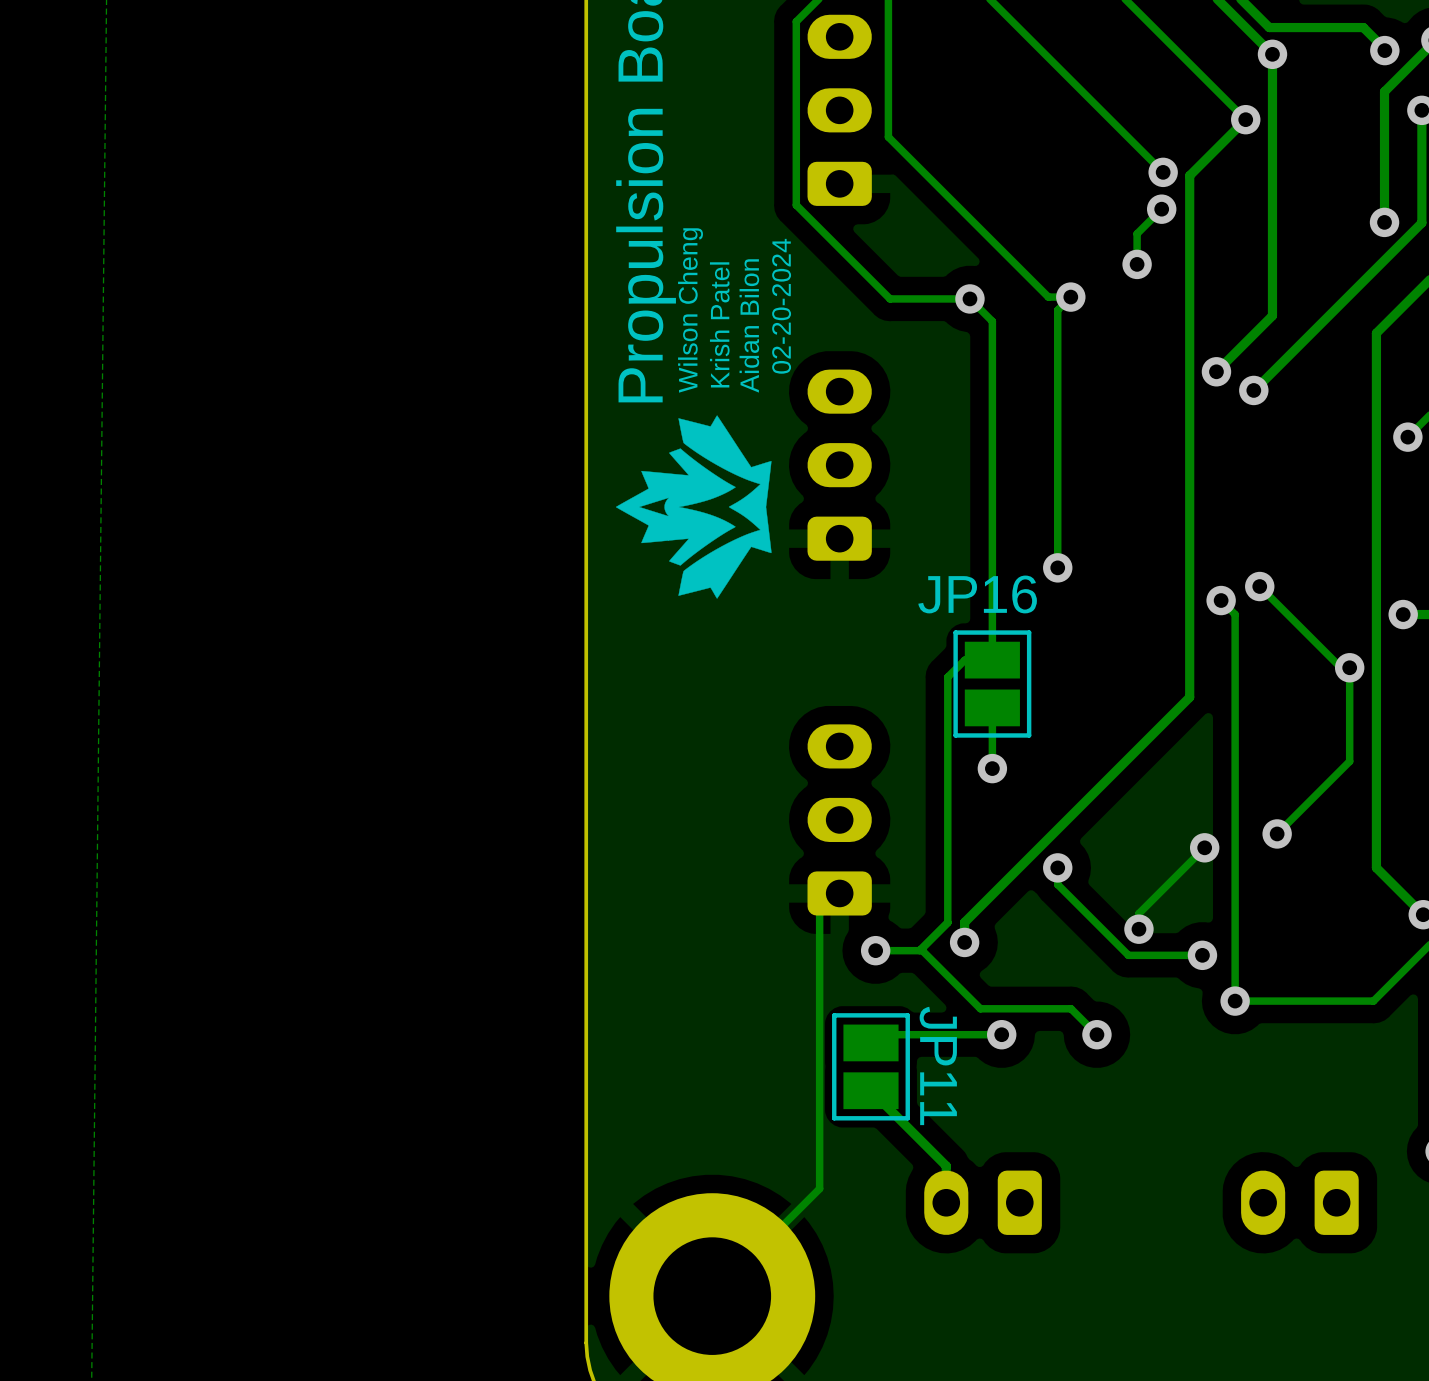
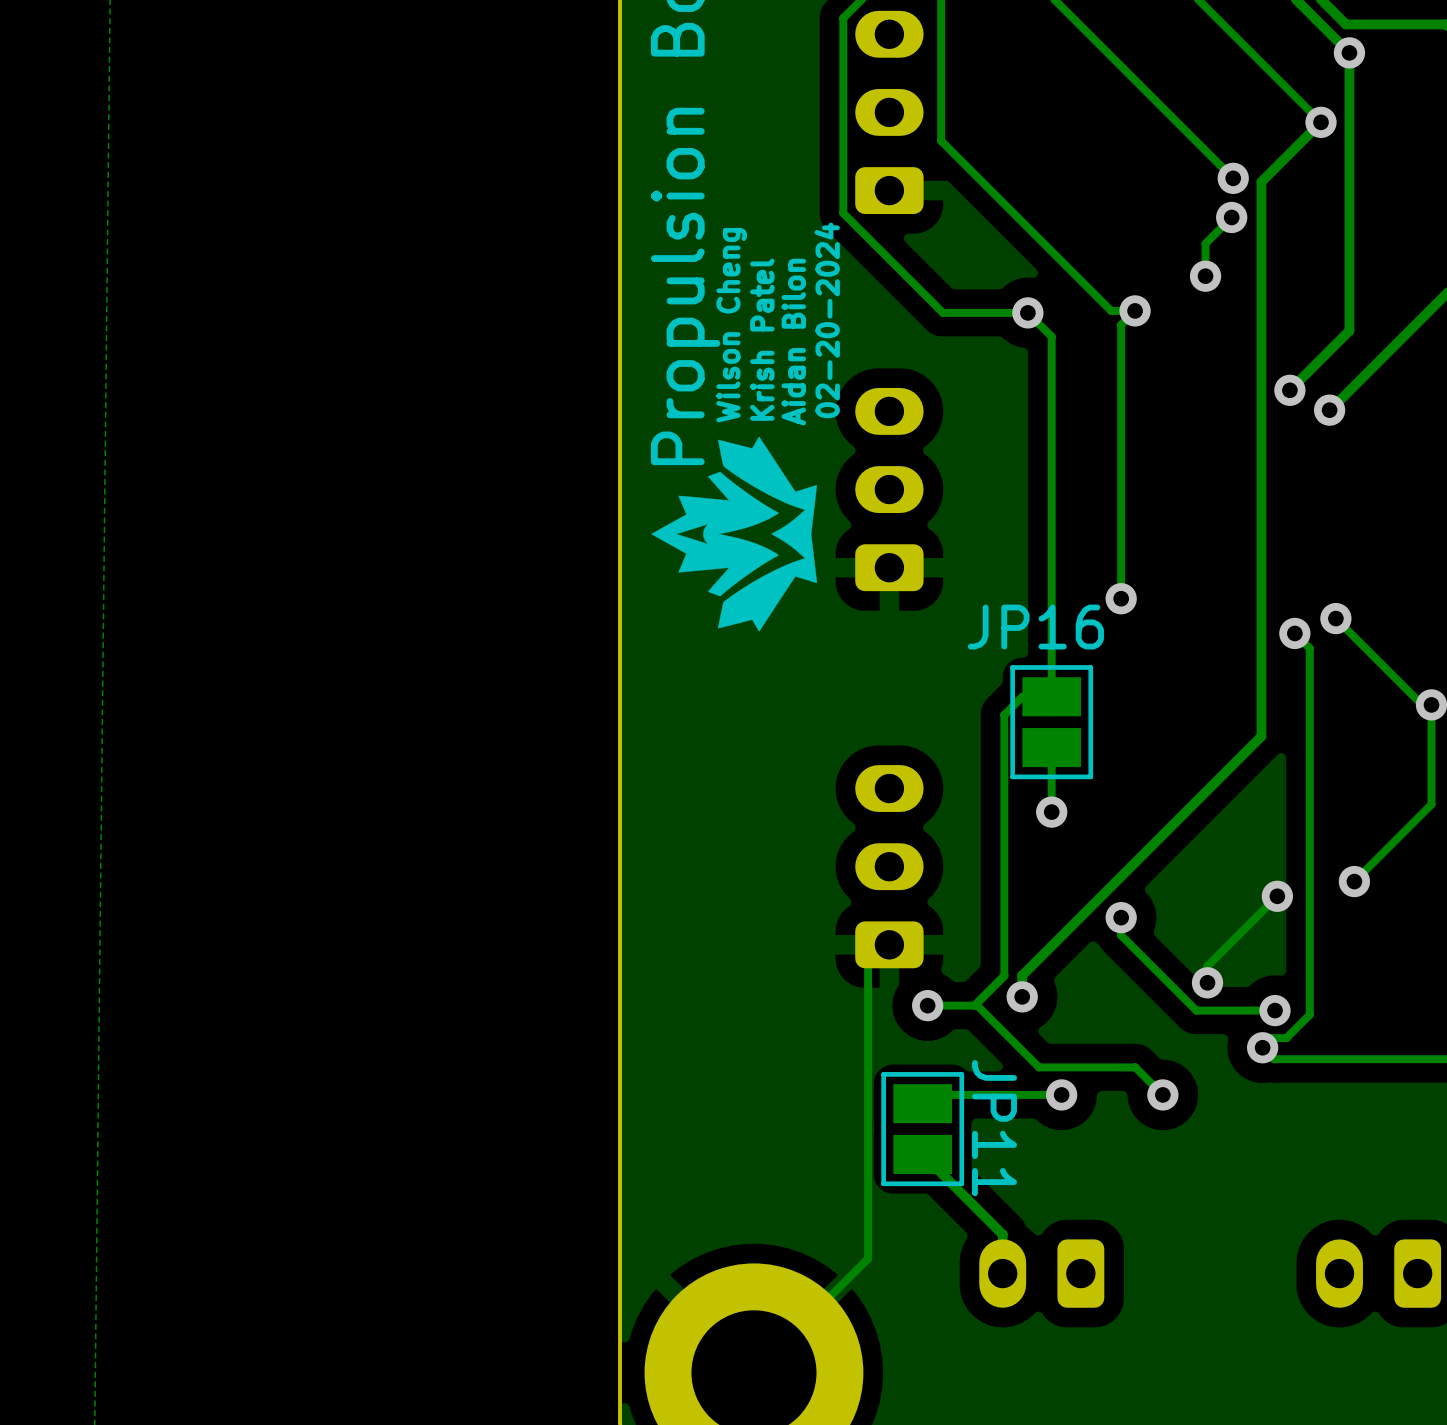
track: (1235, 959) (1235, 1001) -> (1309, 1014) (1286, 1038) (1272, 1038) (1262, 1047) (1274, 1059) (1309, 1059)
via position: (1235, 1001) -> (1262, 1047)

